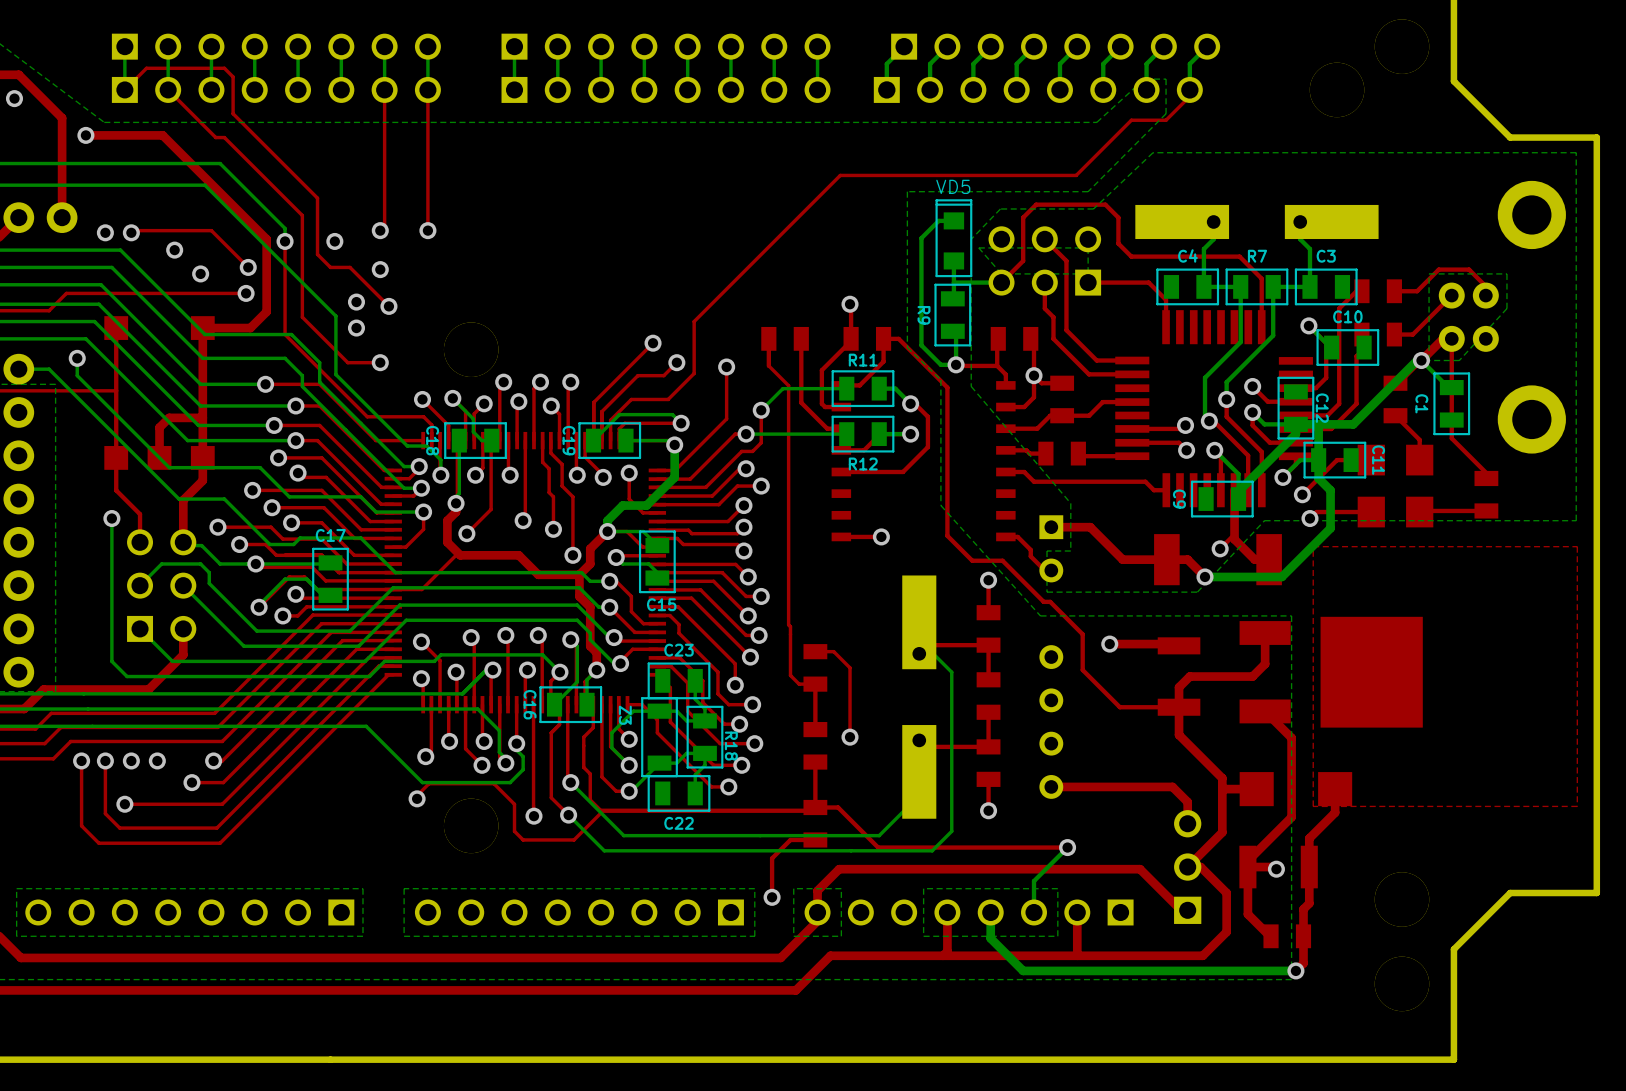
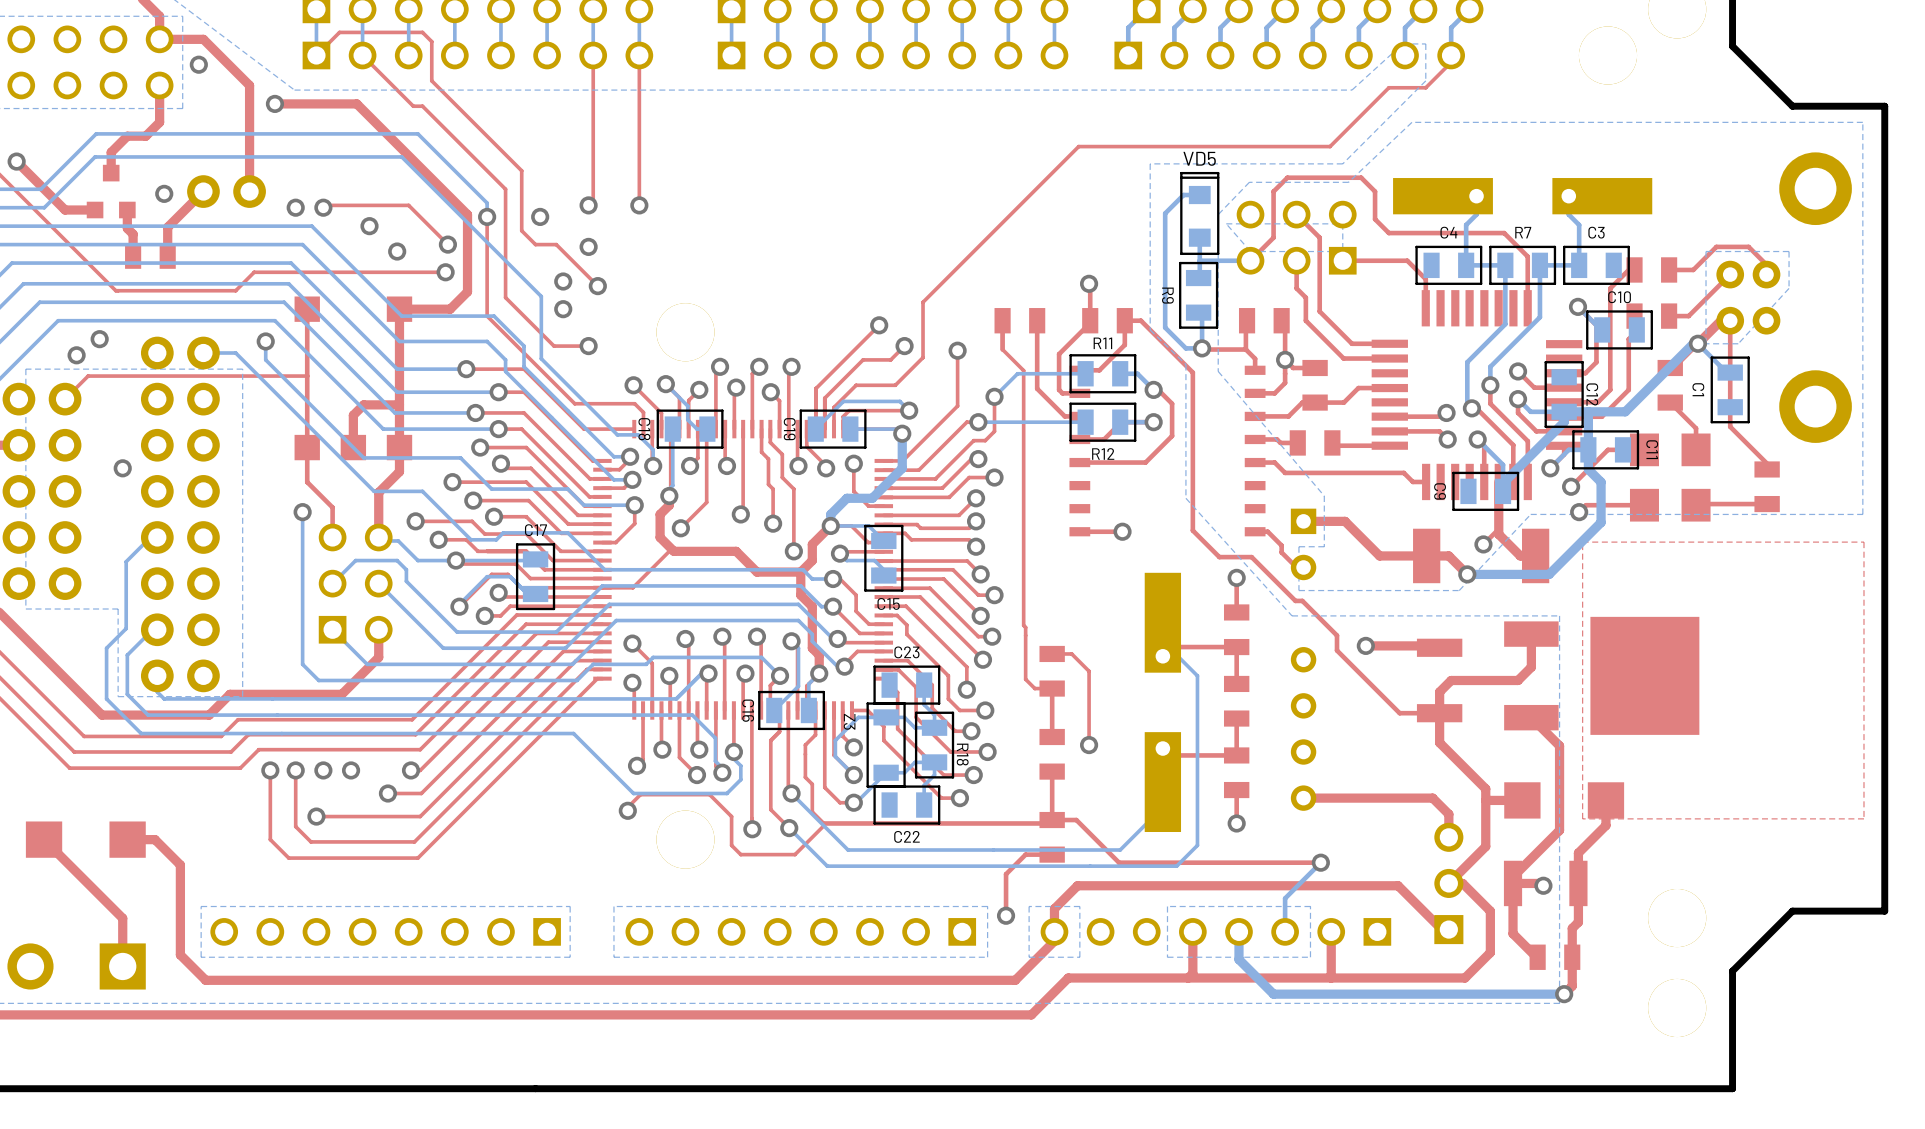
top track: (1082, 648) (1082, 670) (1119, 707) (1141, 707) -> (1337, 650) (1399, 713)

